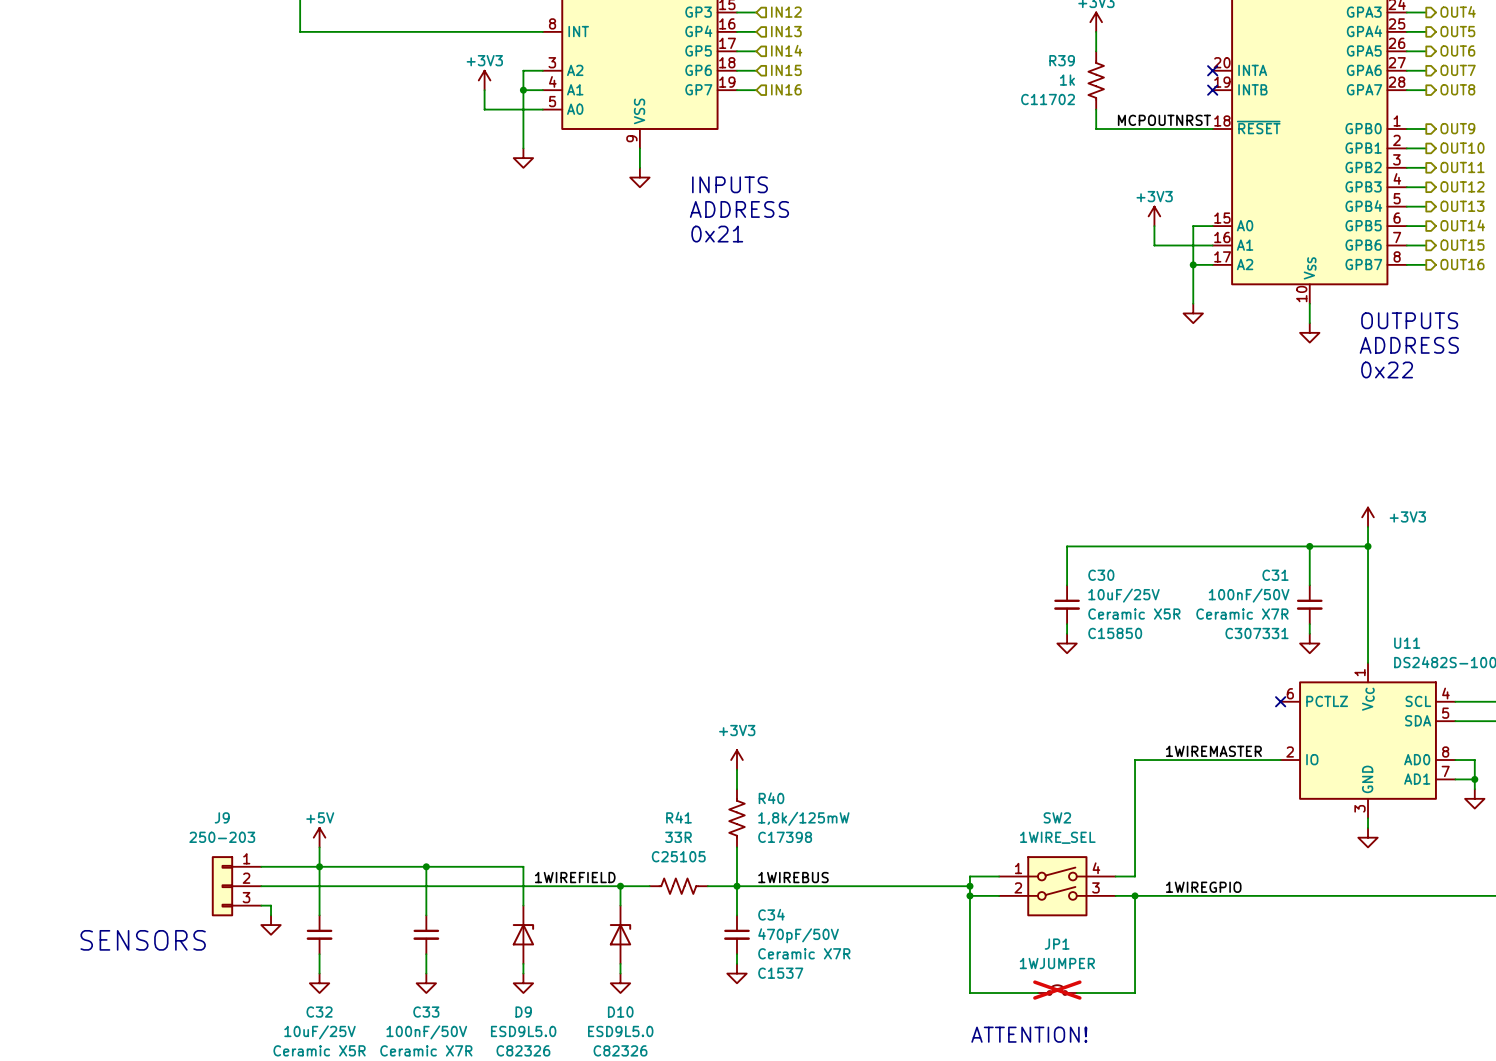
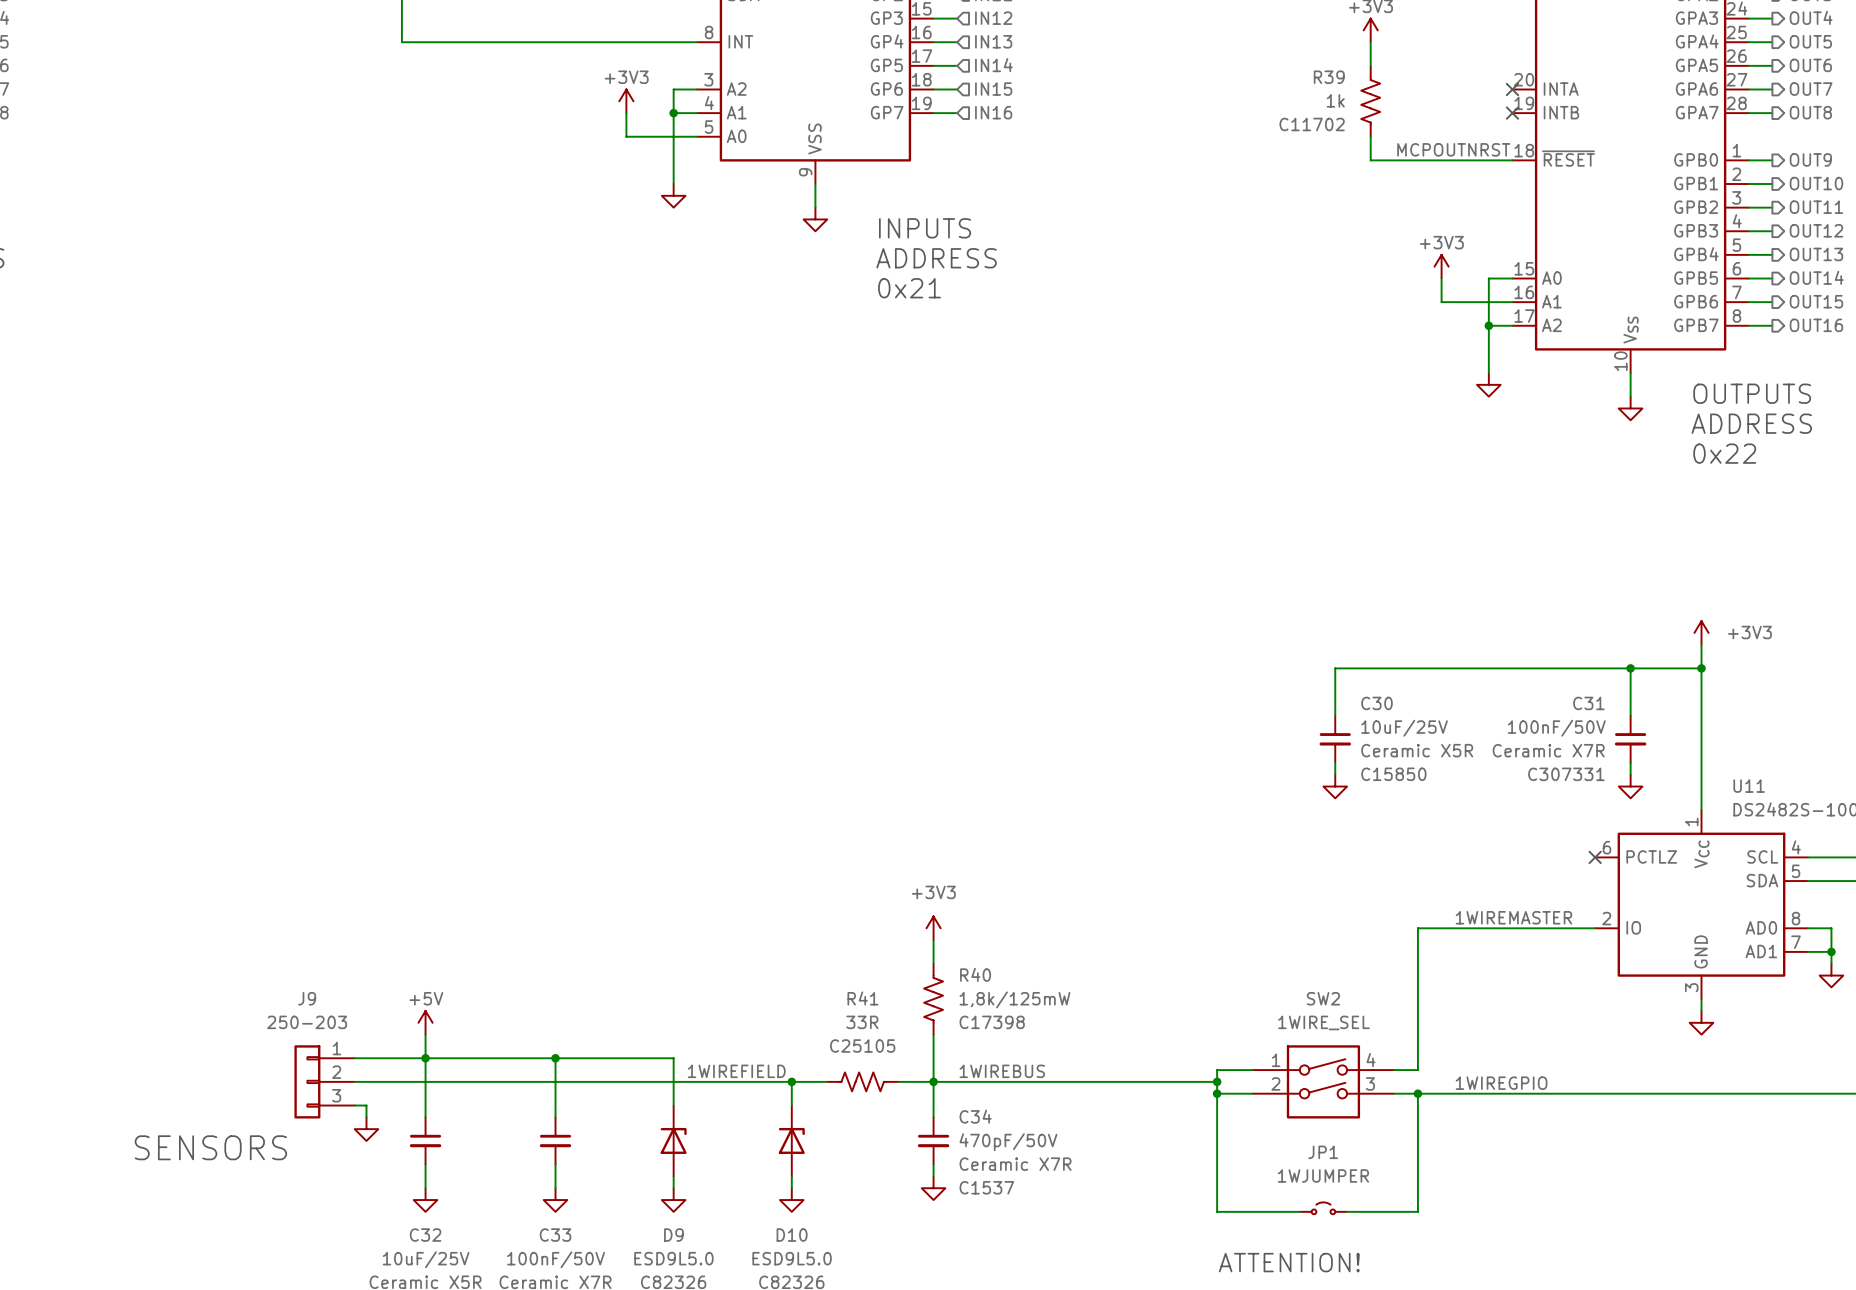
JP1 do-not-place cross: (1057, 990) -> none

